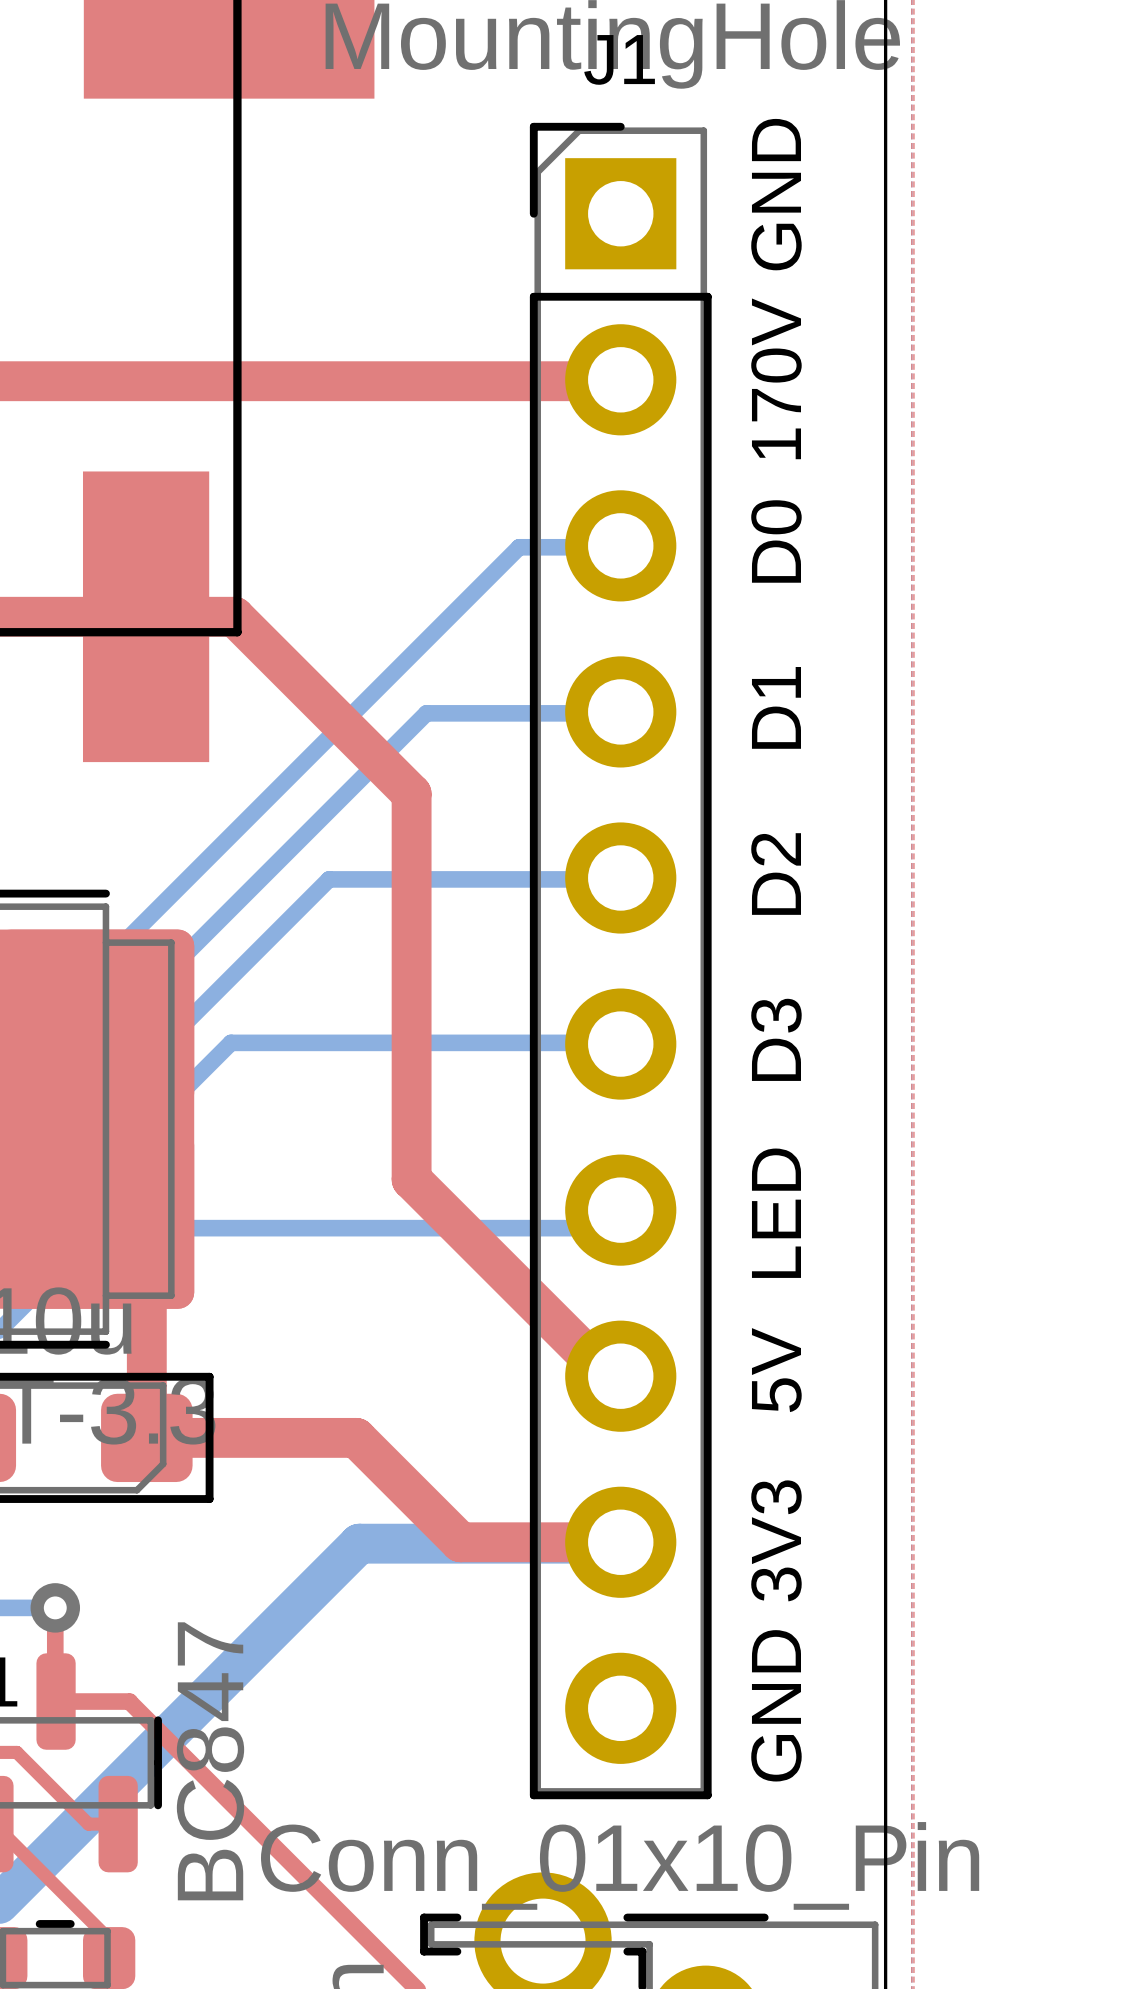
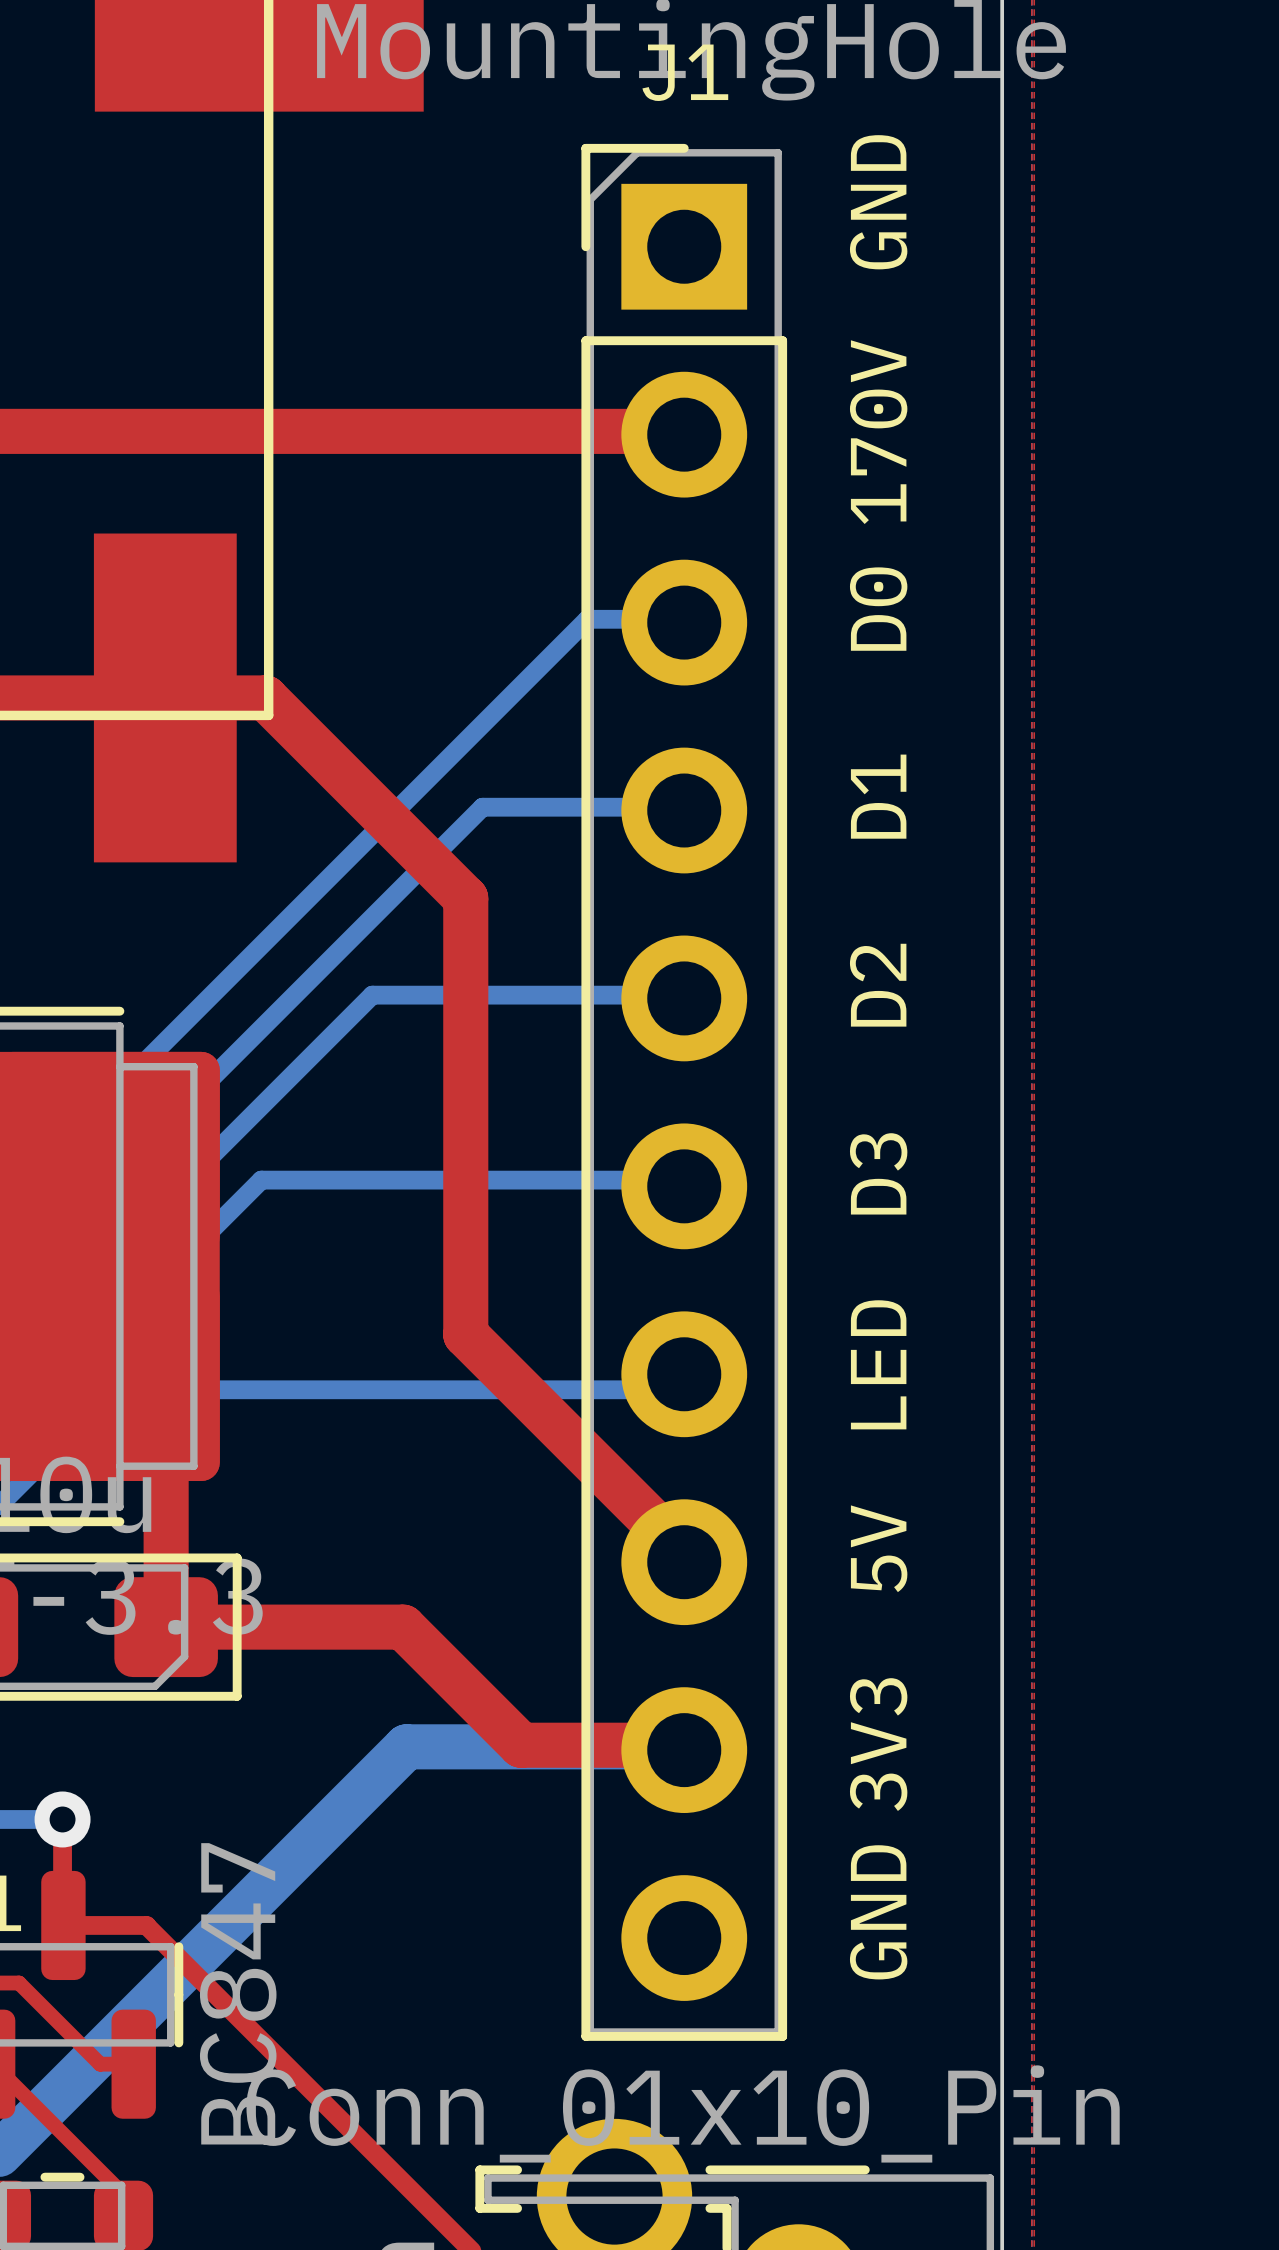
J1 position: (620, 961) -> (684, 1092)

